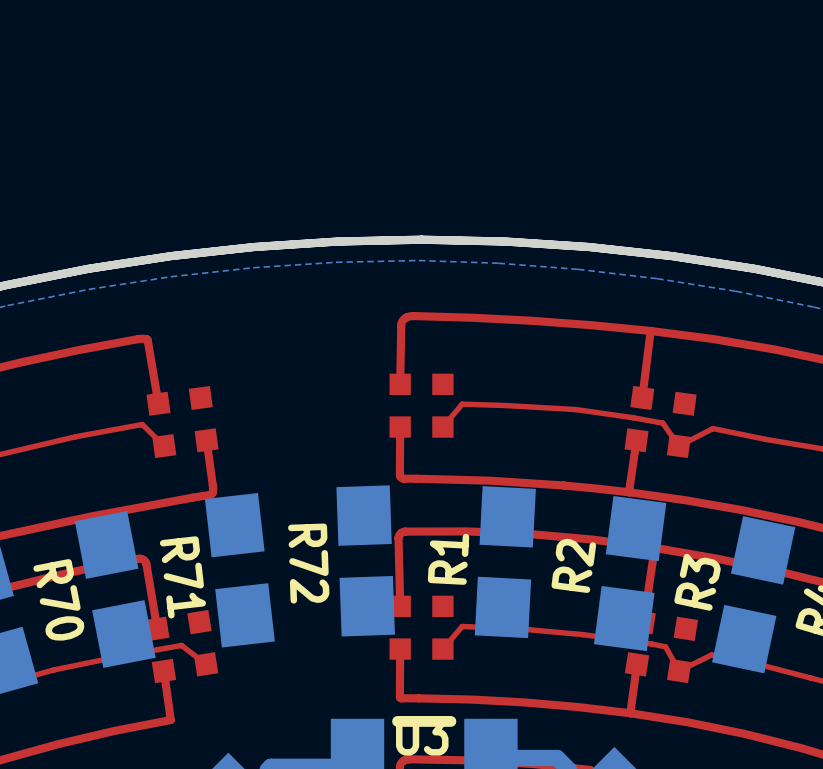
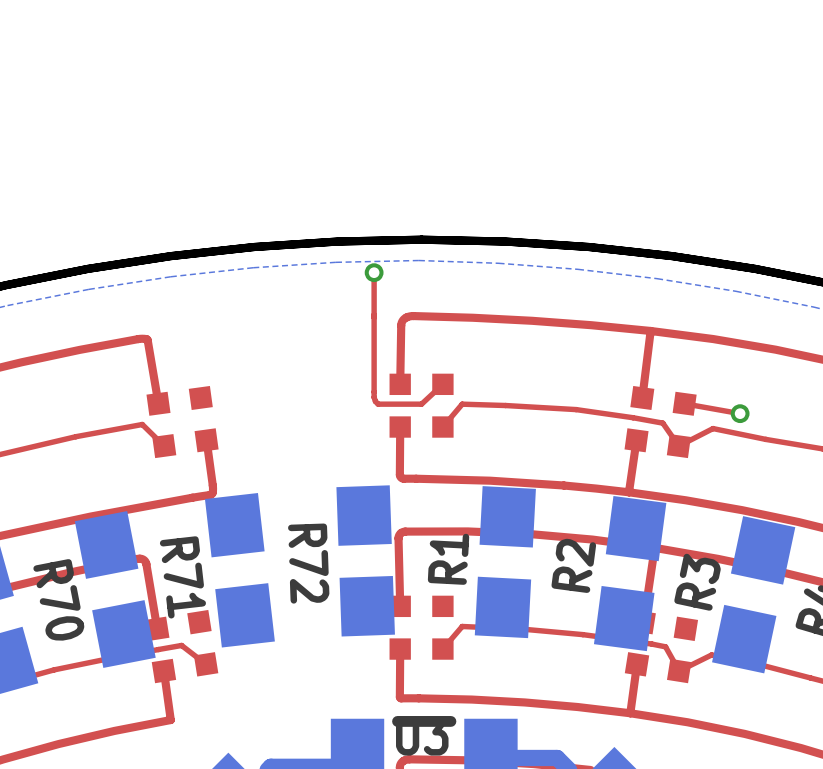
top track: none -> (374, 272) (375, 401) (378, 404) (421, 404) (442, 384)
via: none -> (374, 272)
top track: none -> (684, 403) (740, 413)
via: none -> (740, 413)

